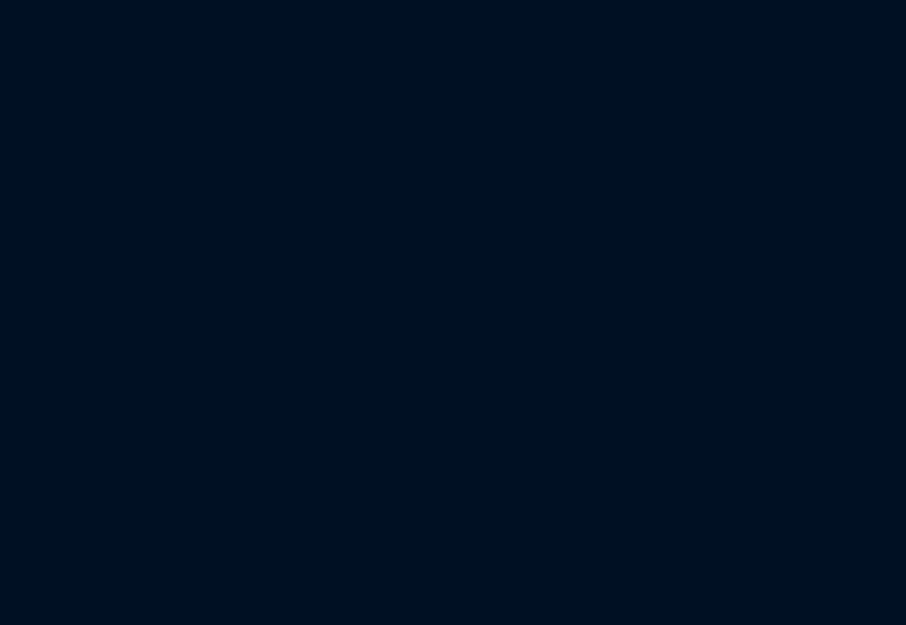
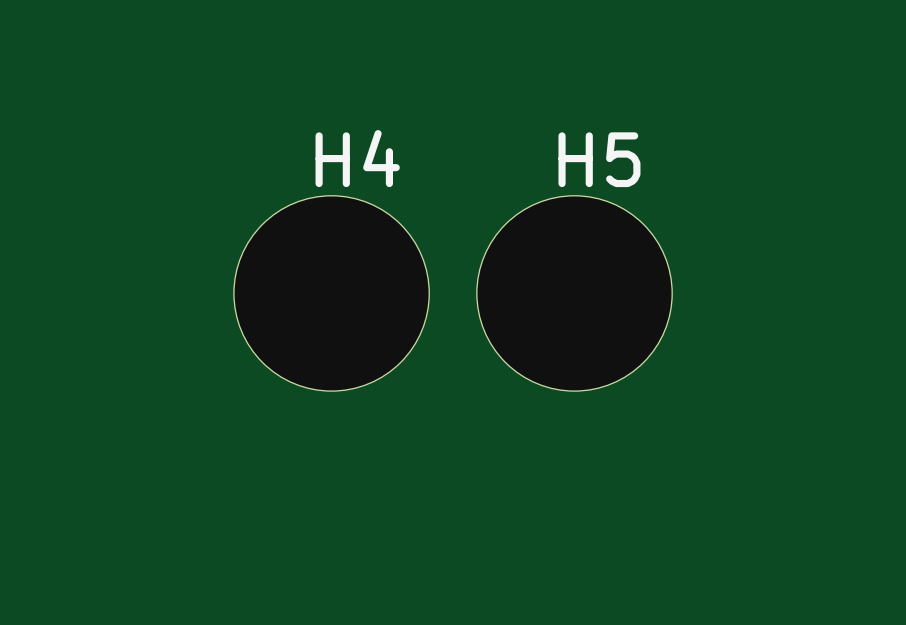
H4: none -> (331, 293)
H5: none -> (574, 293)

